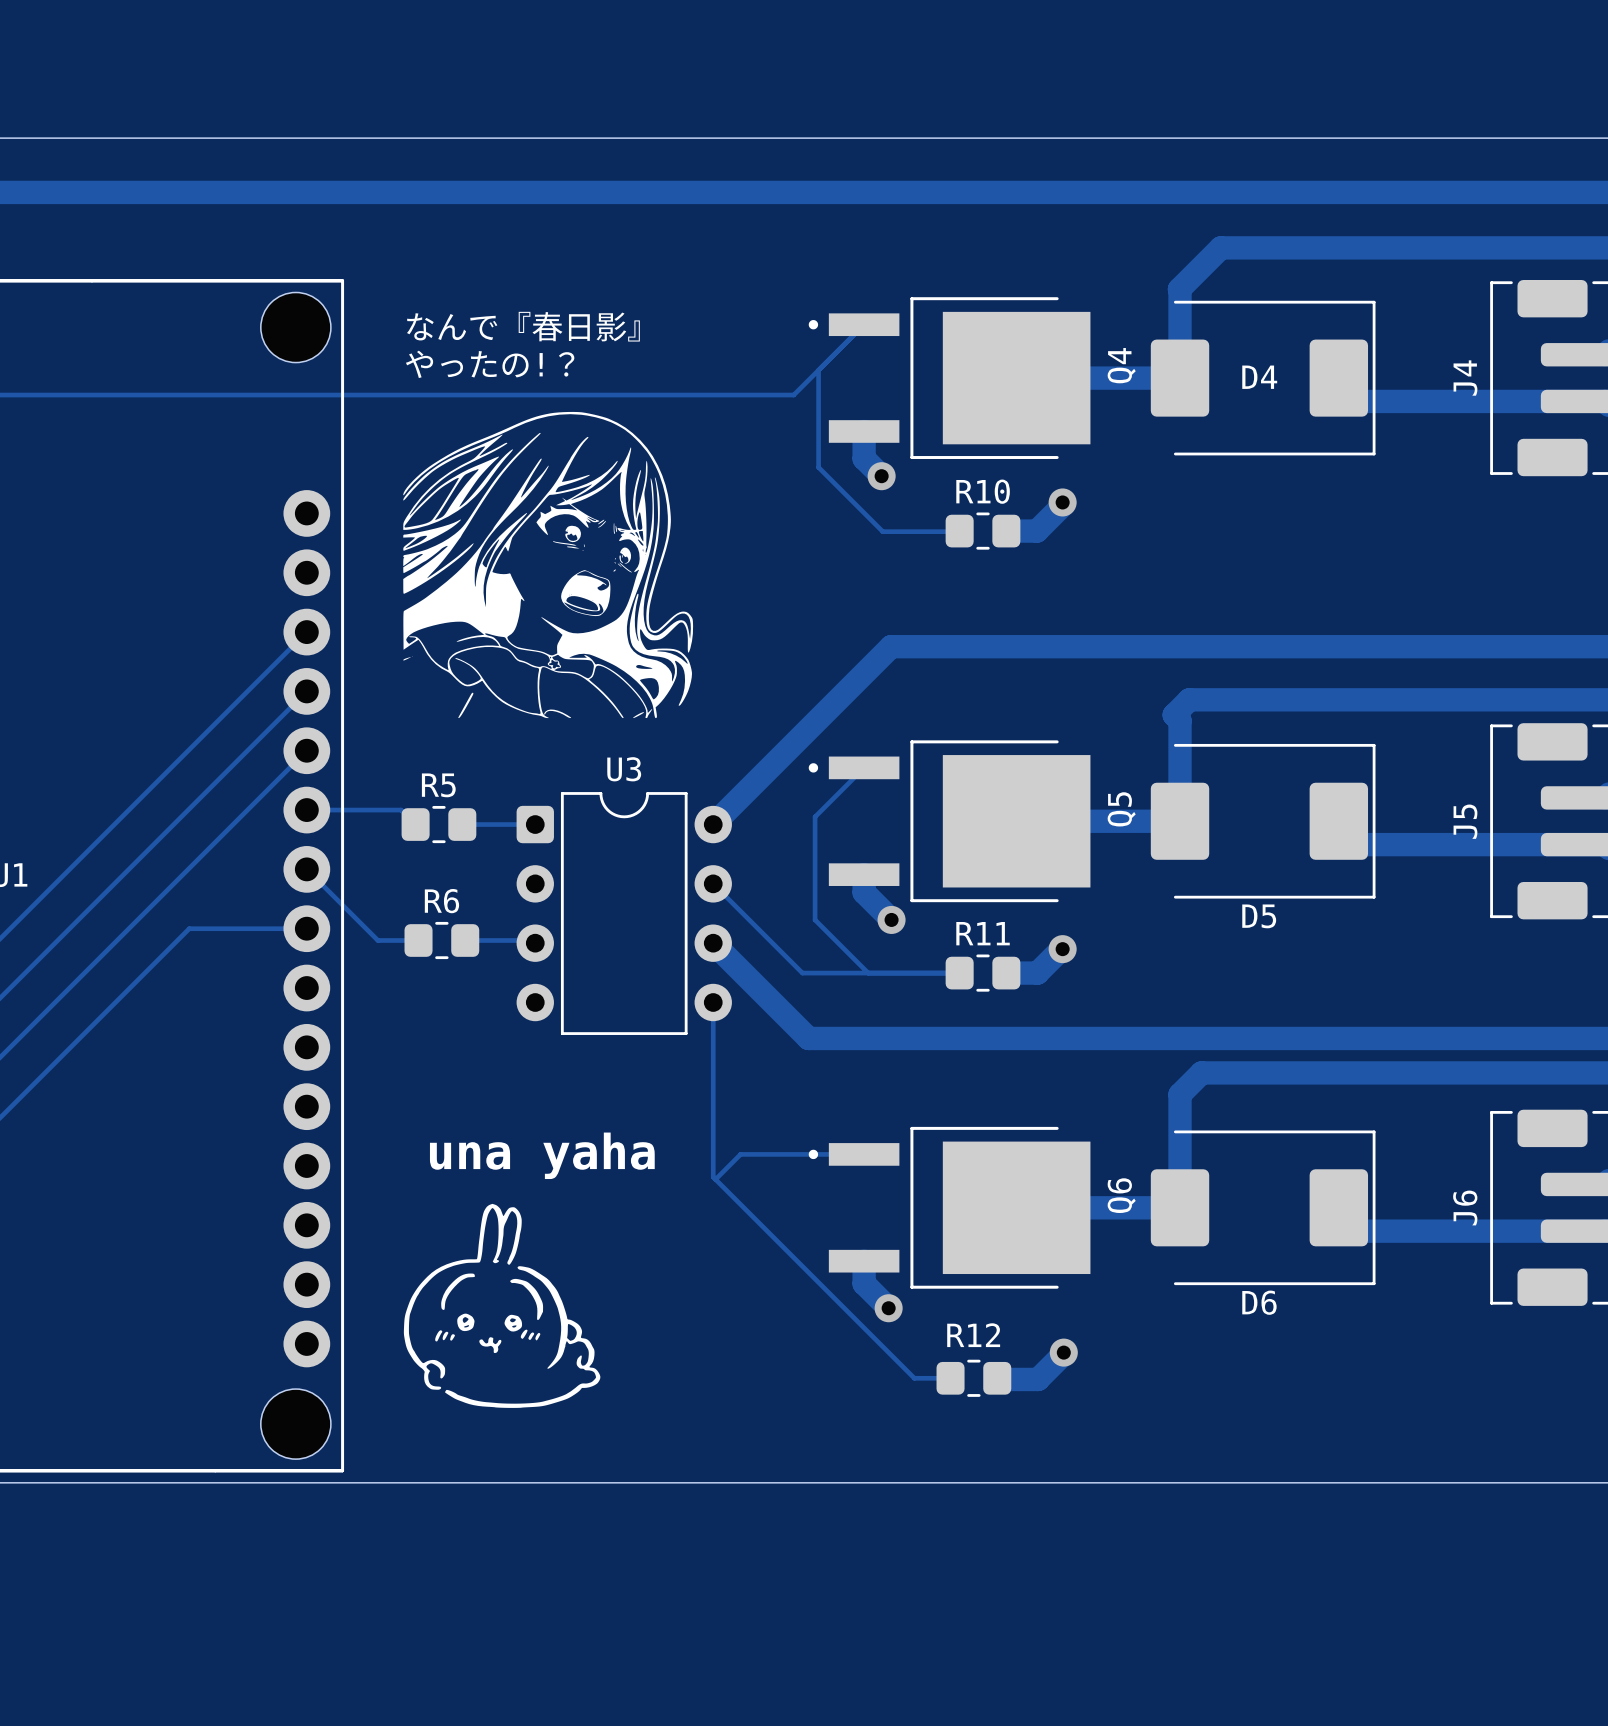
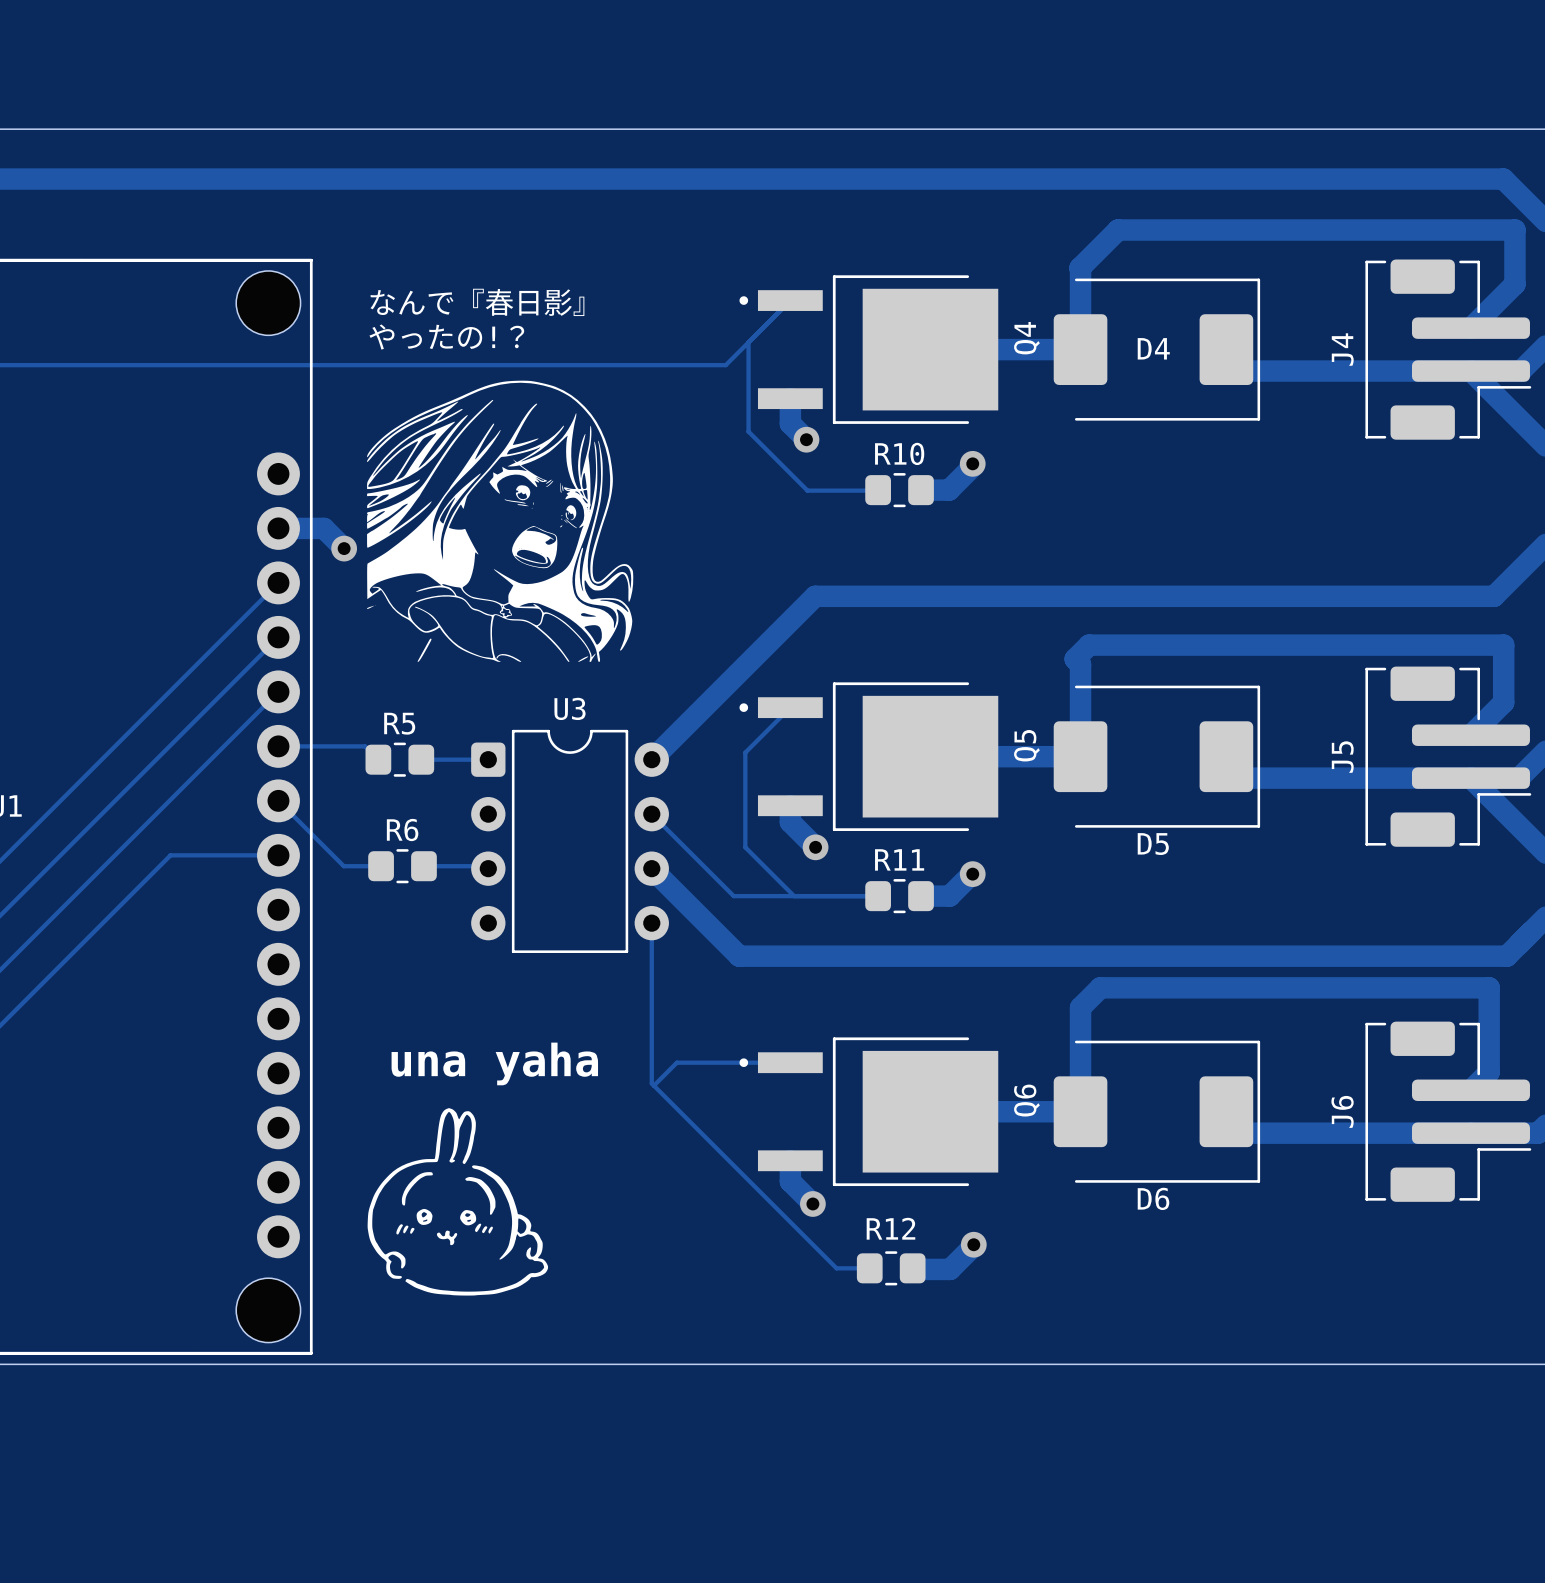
track: none -> (278, 528) (323, 528) (344, 548)
via: none -> (344, 548)

